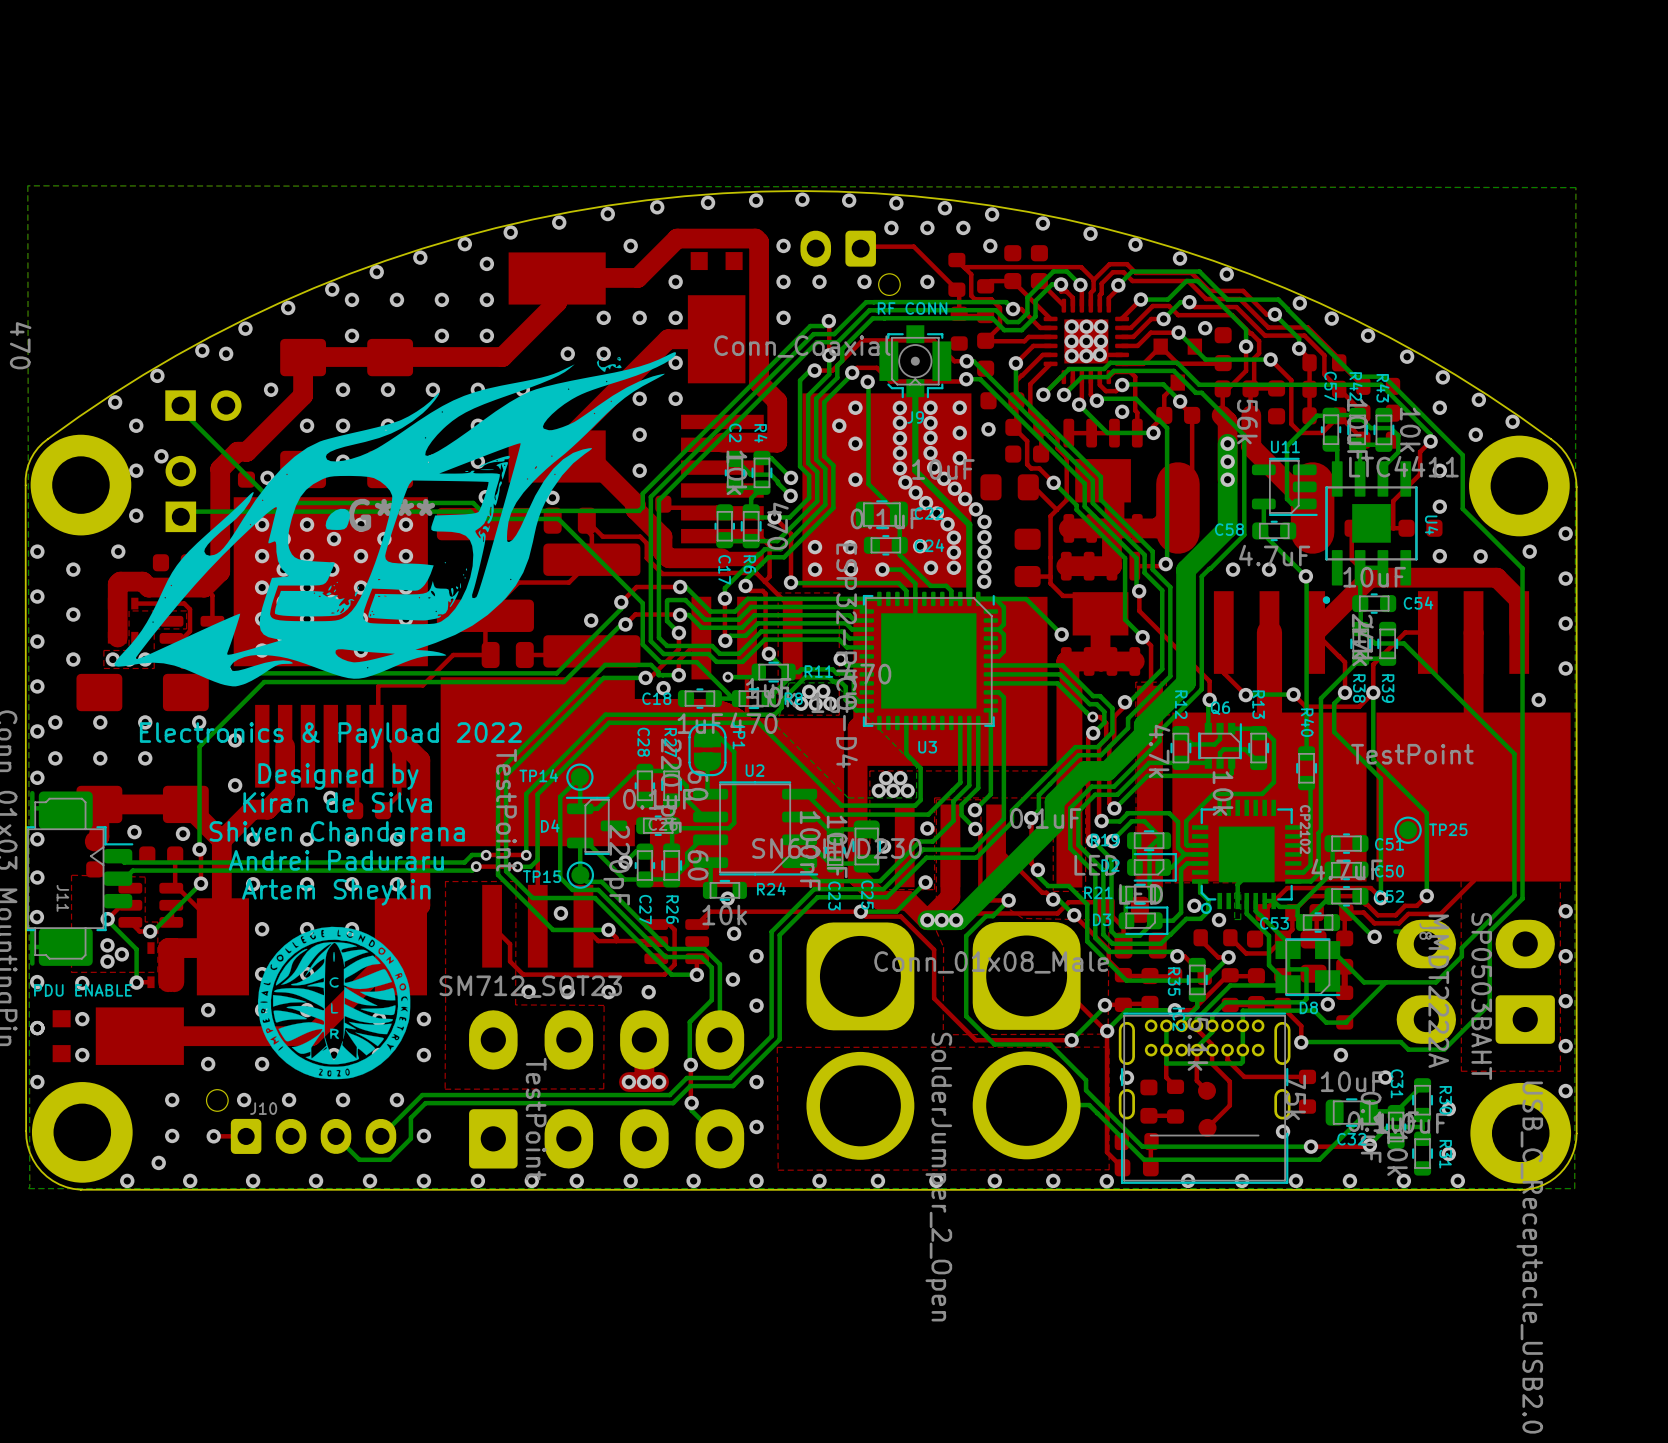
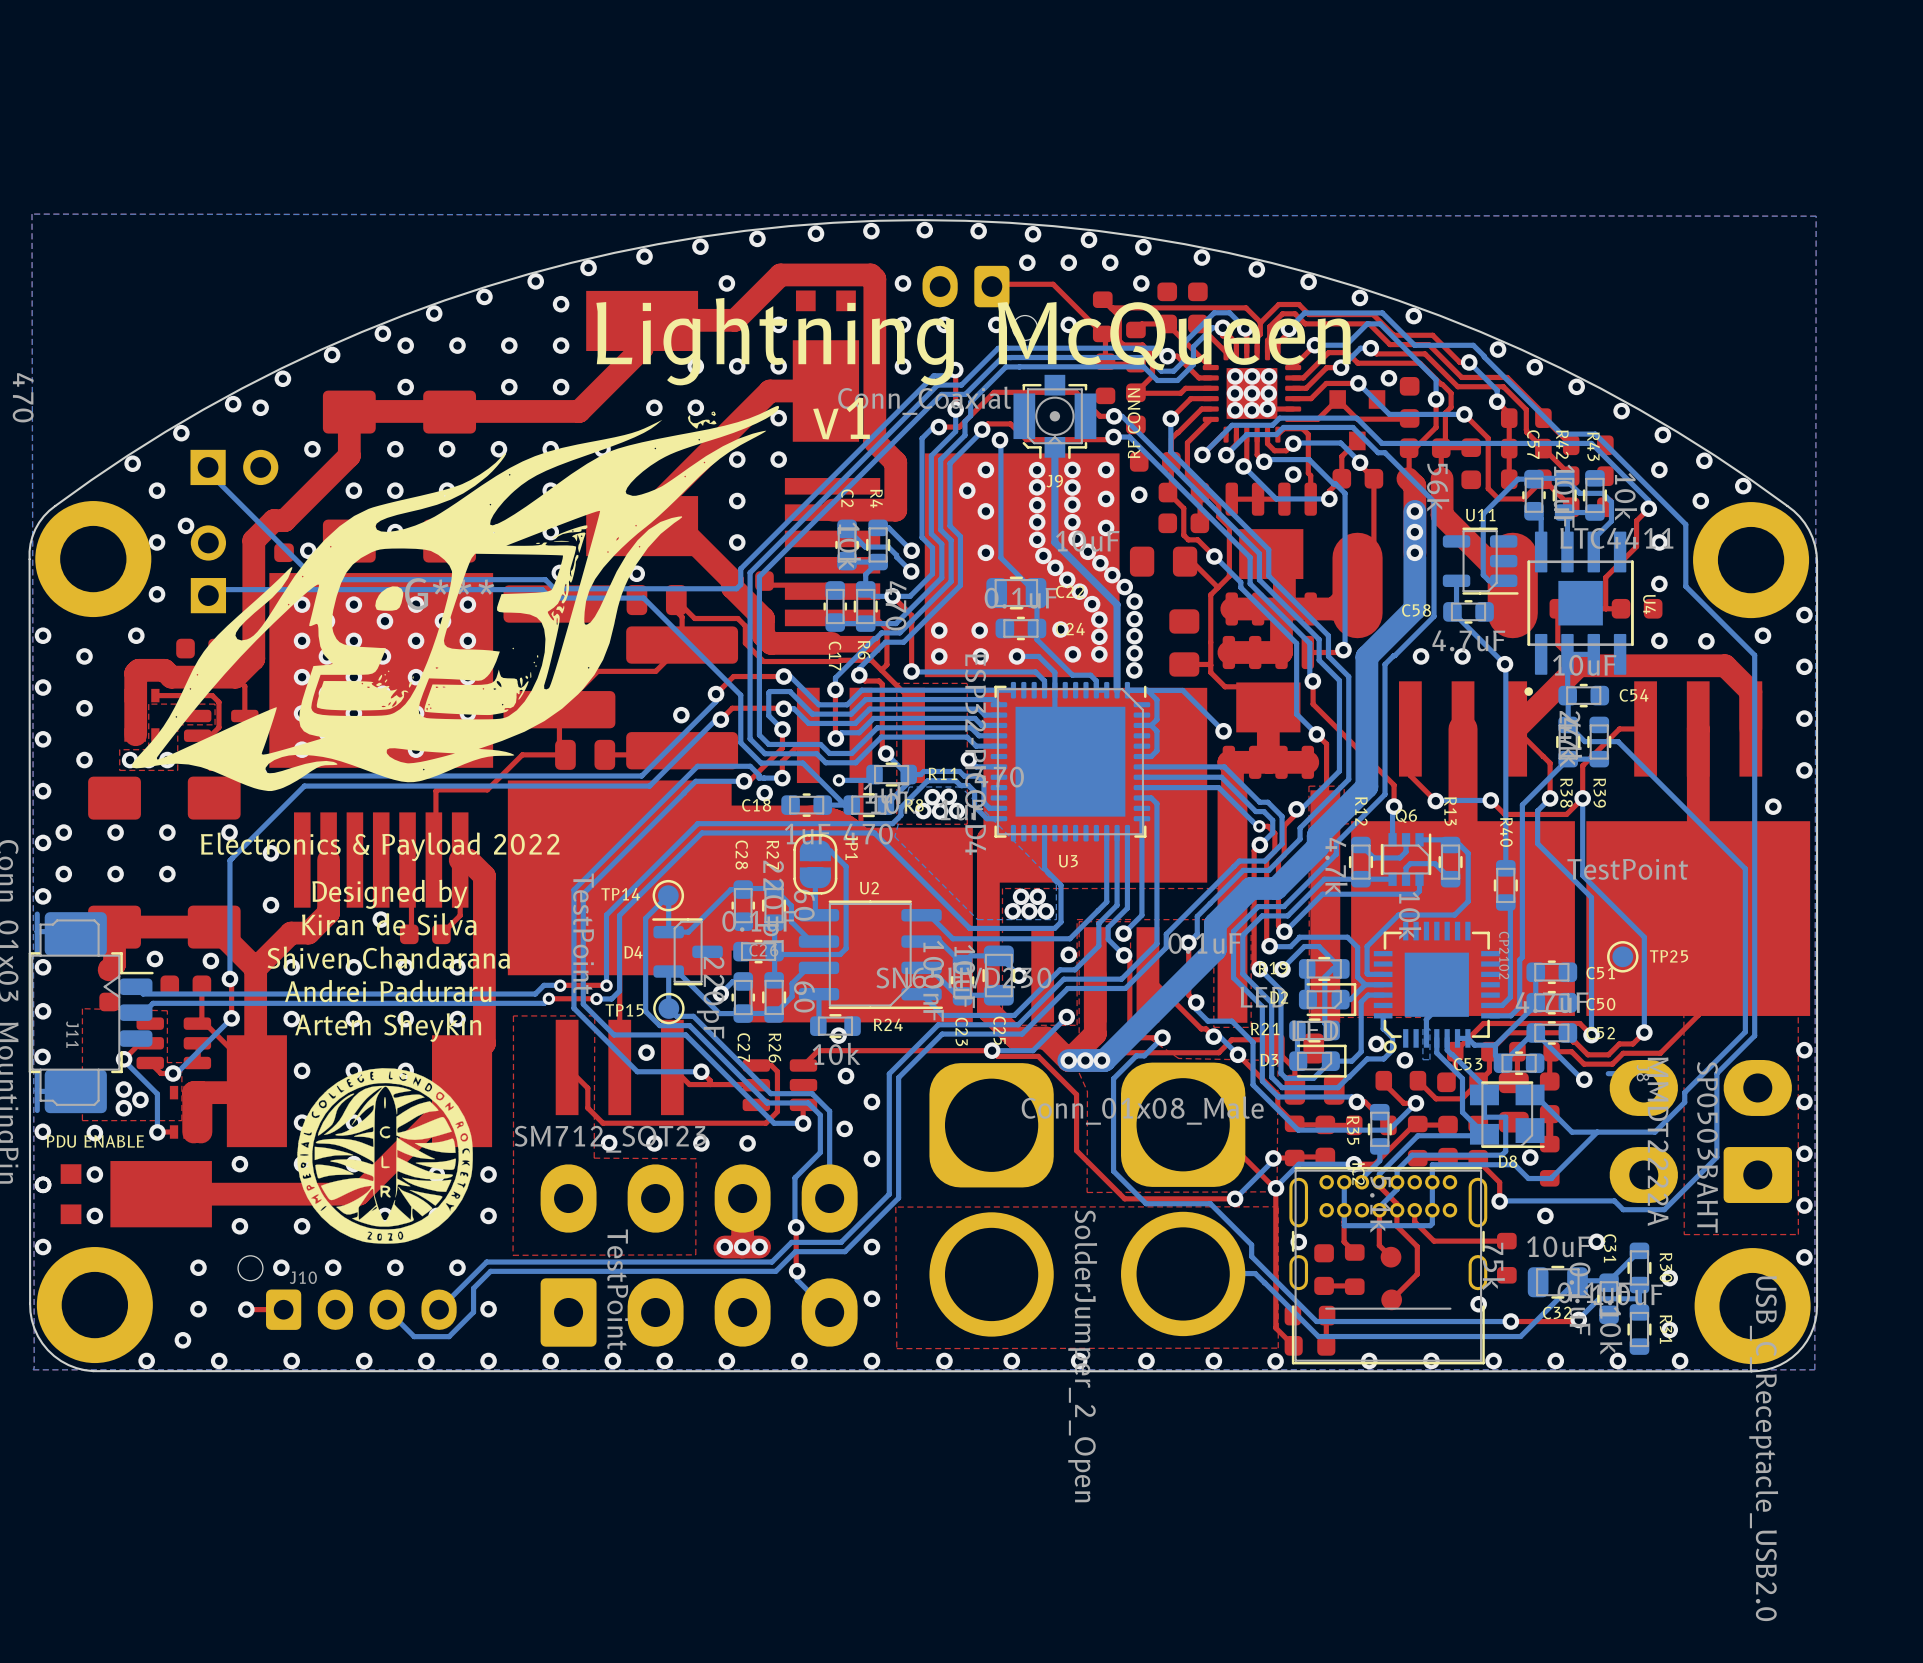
text: none -> Lightning McQueen (973, 341)
text rotation: 0° (912, 308) -> 90° counterclockwise (1134, 423)
text position: RF CONN (912, 308) -> RF CONN (1134, 423)
text: none -> v1 (841, 418)

